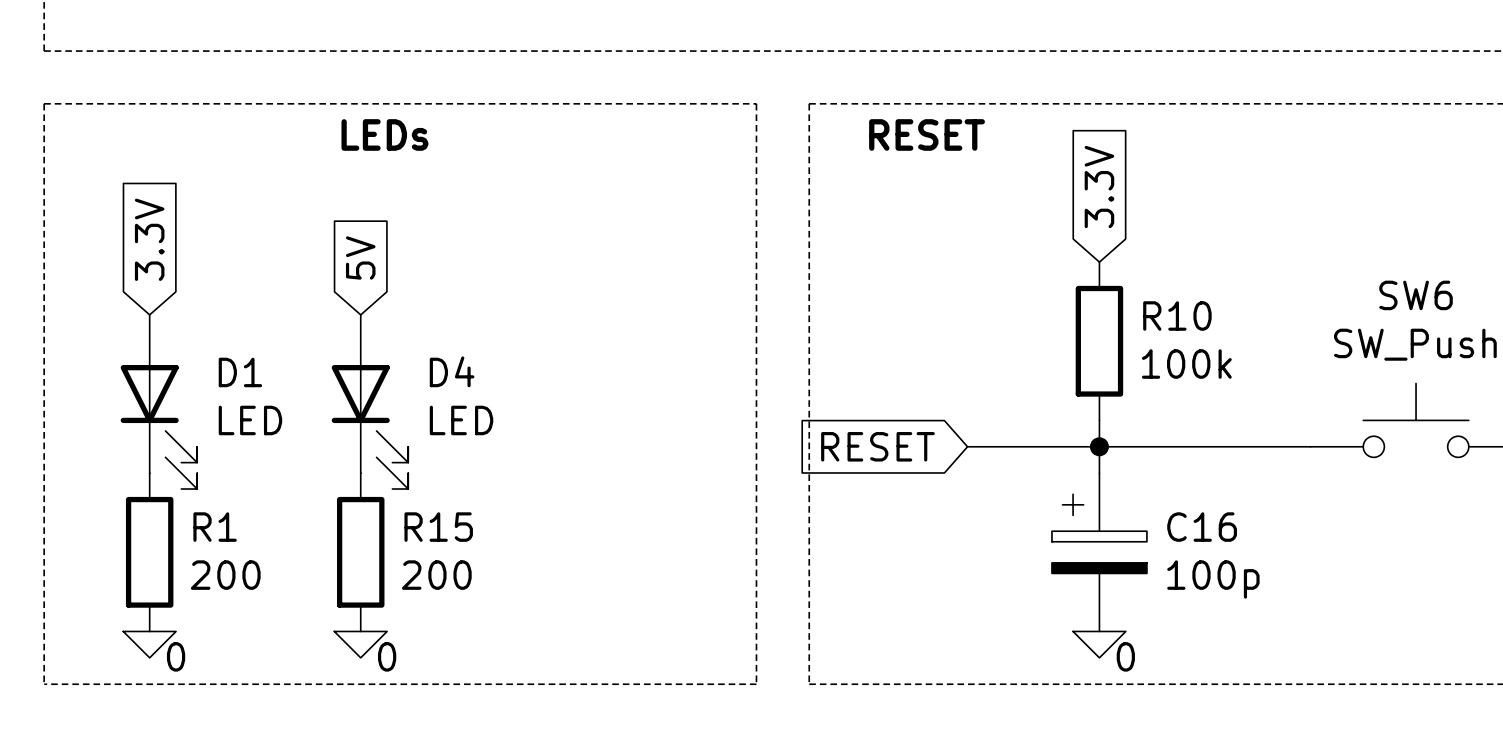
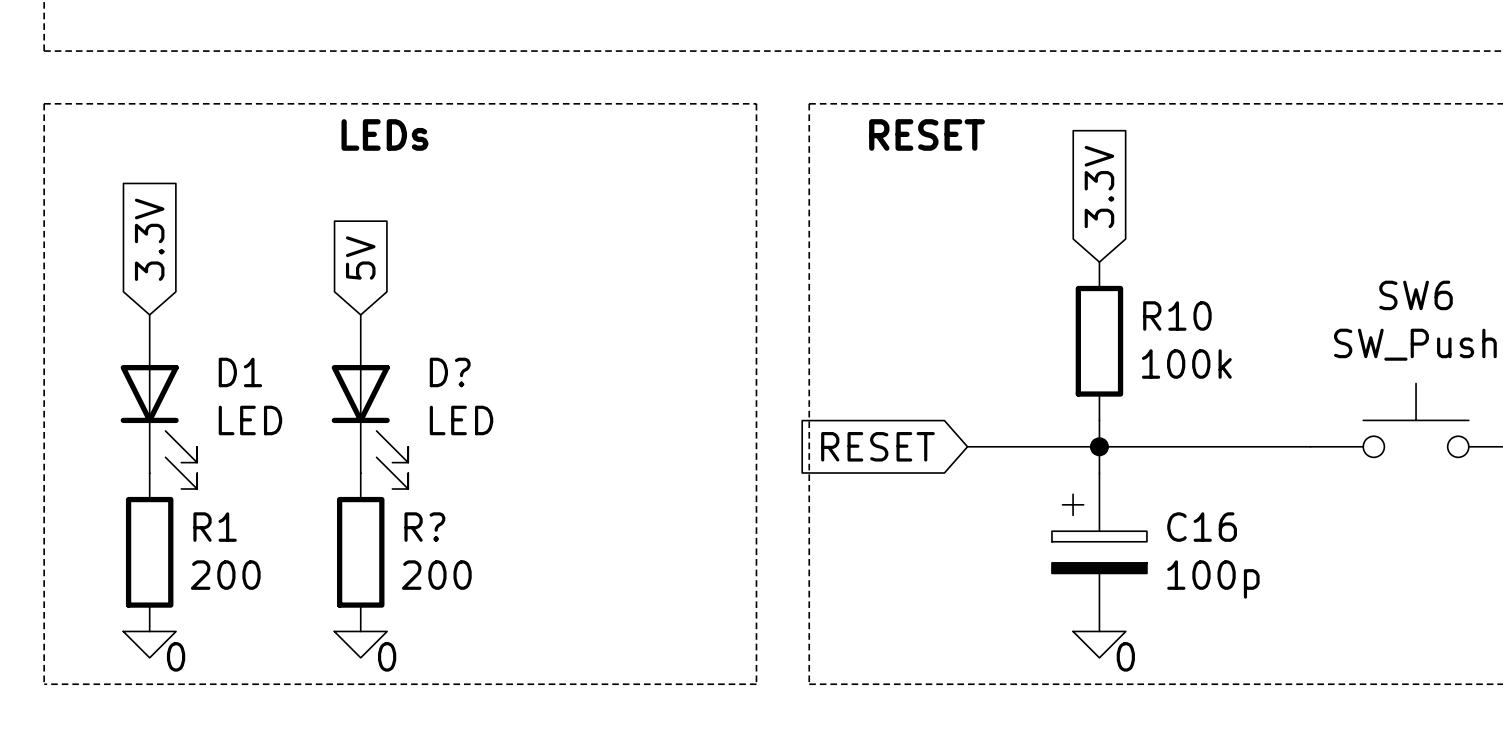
D4 name: D4 (452, 371) -> D? (450, 372)
R15 name: R15 (438, 527) -> R? (424, 527)

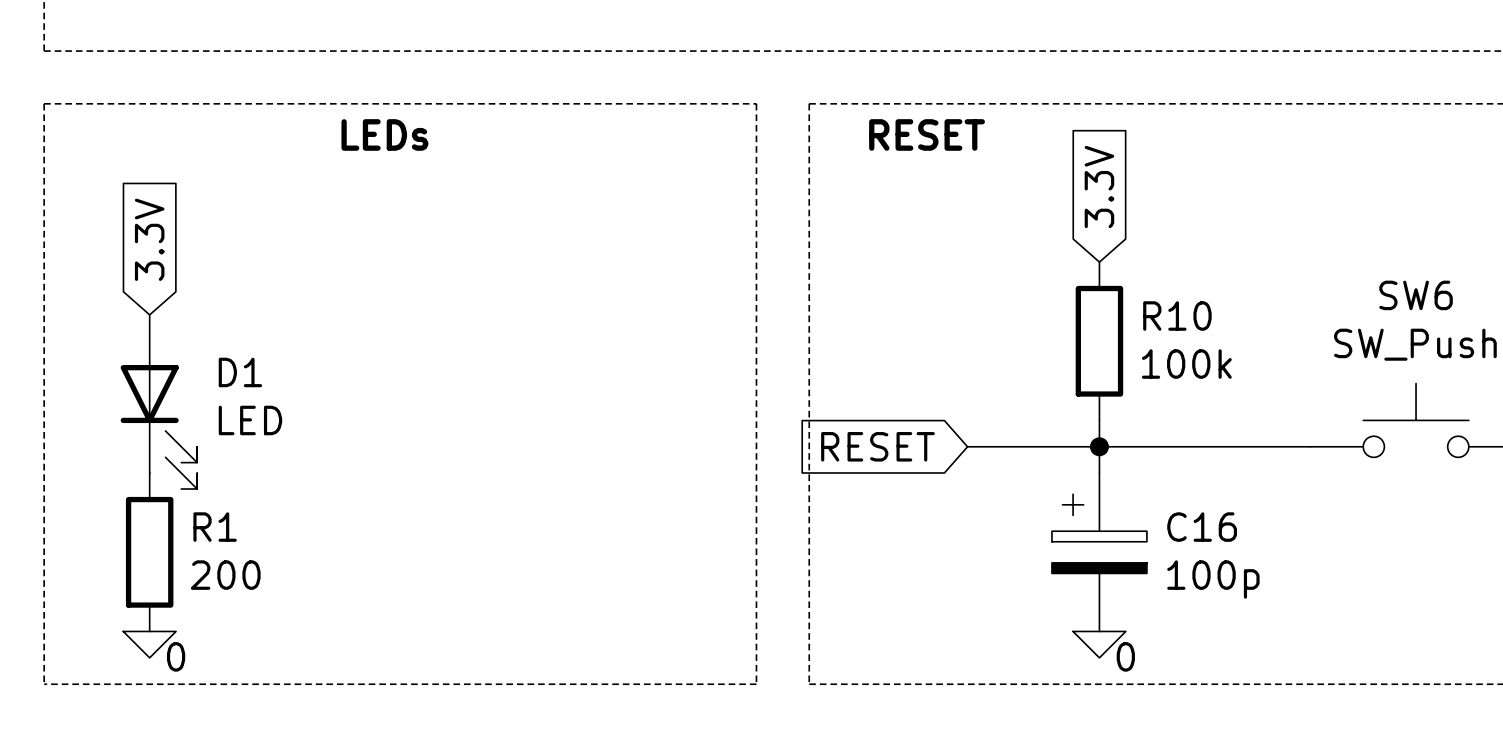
global label: 5V (360, 257) -> none
D?: LED (369, 401) -> none
R?: 200 (360, 552) -> none
power symbol: 0 (360, 644) -> none

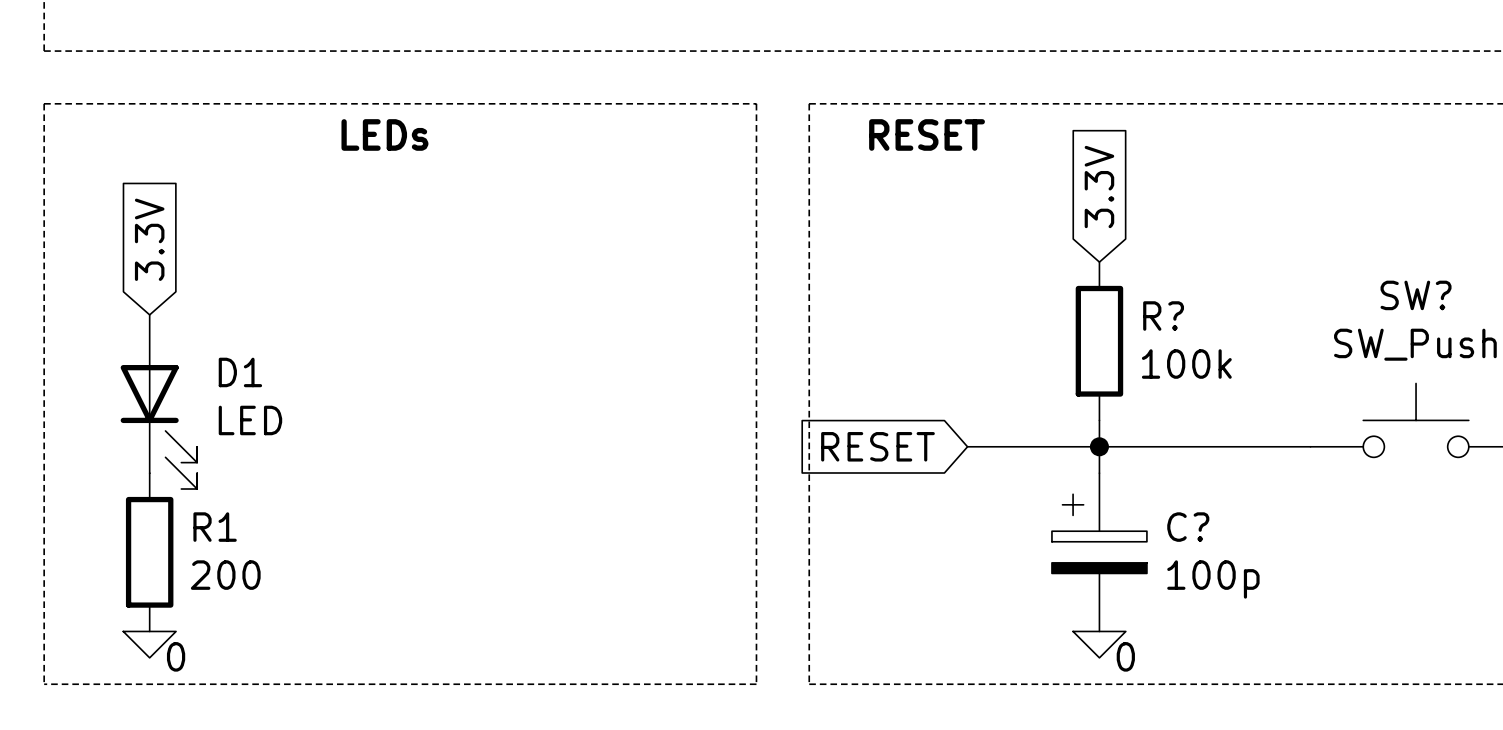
SW6 name: SW6 (1416, 295) -> SW? (1416, 295)
R10 name: R10 (1177, 316) -> R? (1163, 316)
C16 name: C16 (1202, 527) -> C? (1188, 527)

